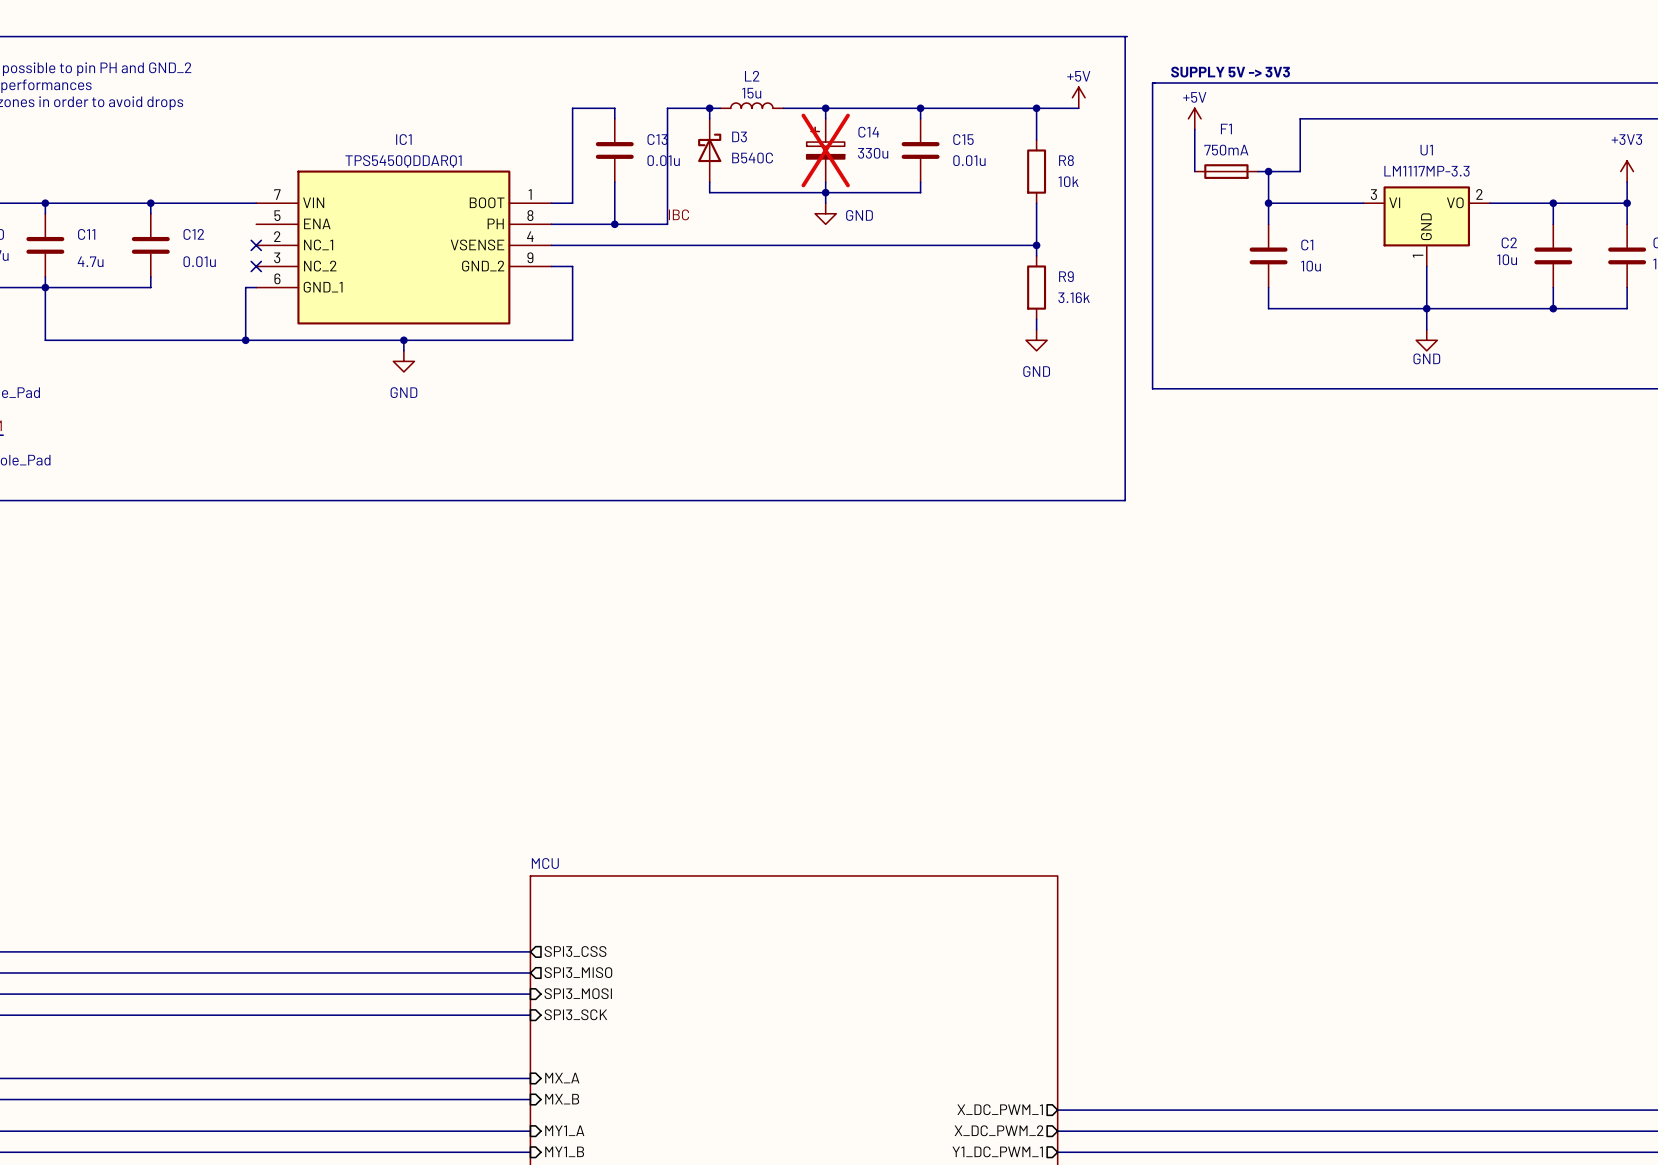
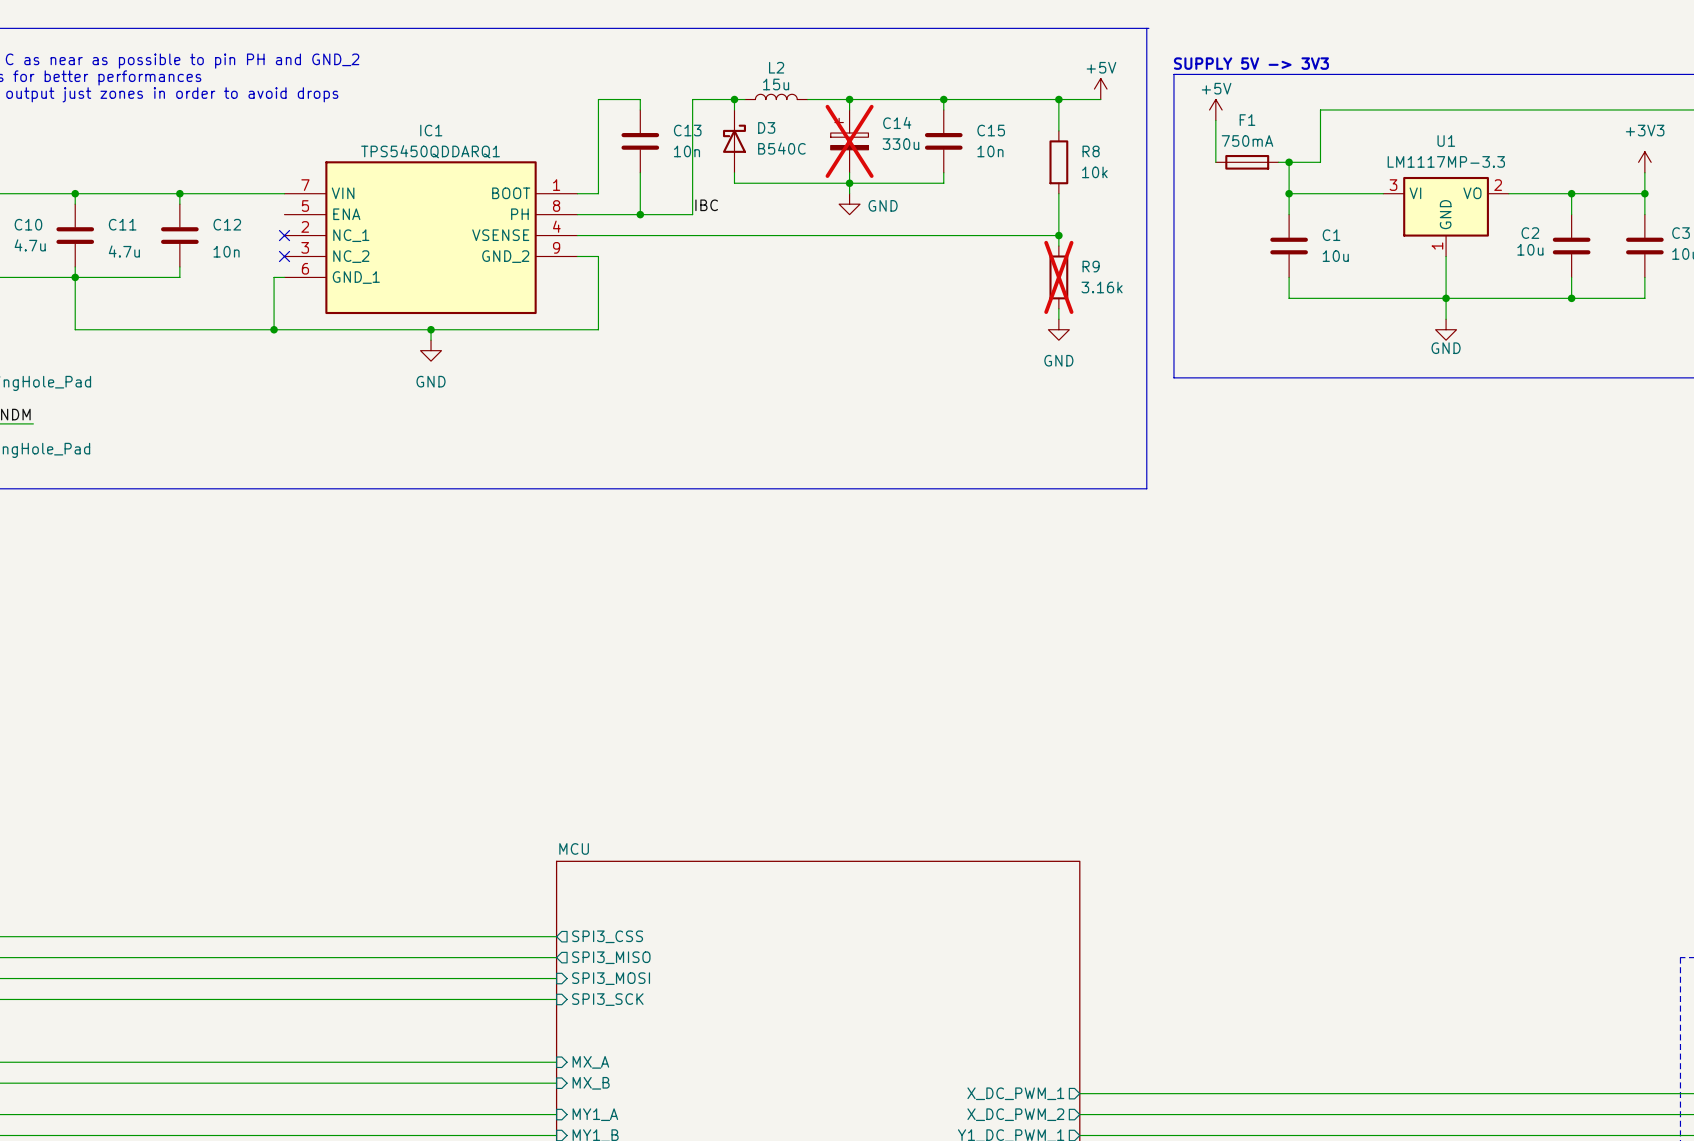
C13 value: 0.01u (663, 160) -> 10n (686, 151)
C15 value: 0.01u (969, 160) -> 10n (990, 151)
C12 value: 0.01u (199, 261) -> 10n (226, 251)
R9 do-not-place cross: none -> (1058, 277)

